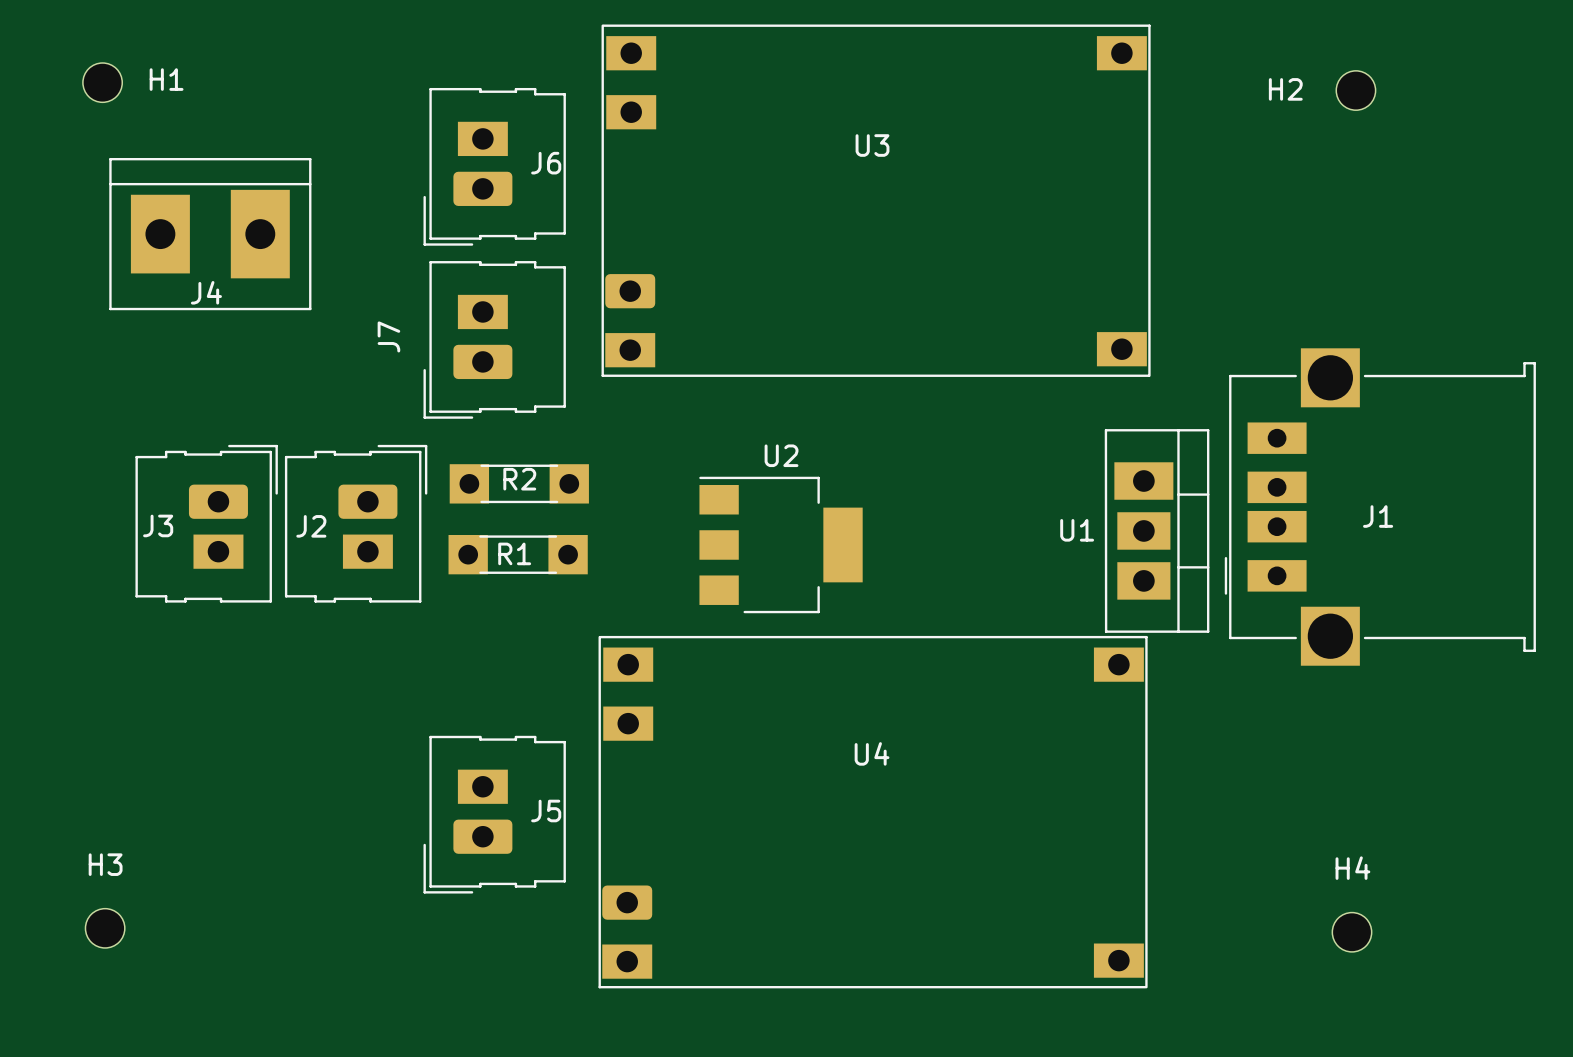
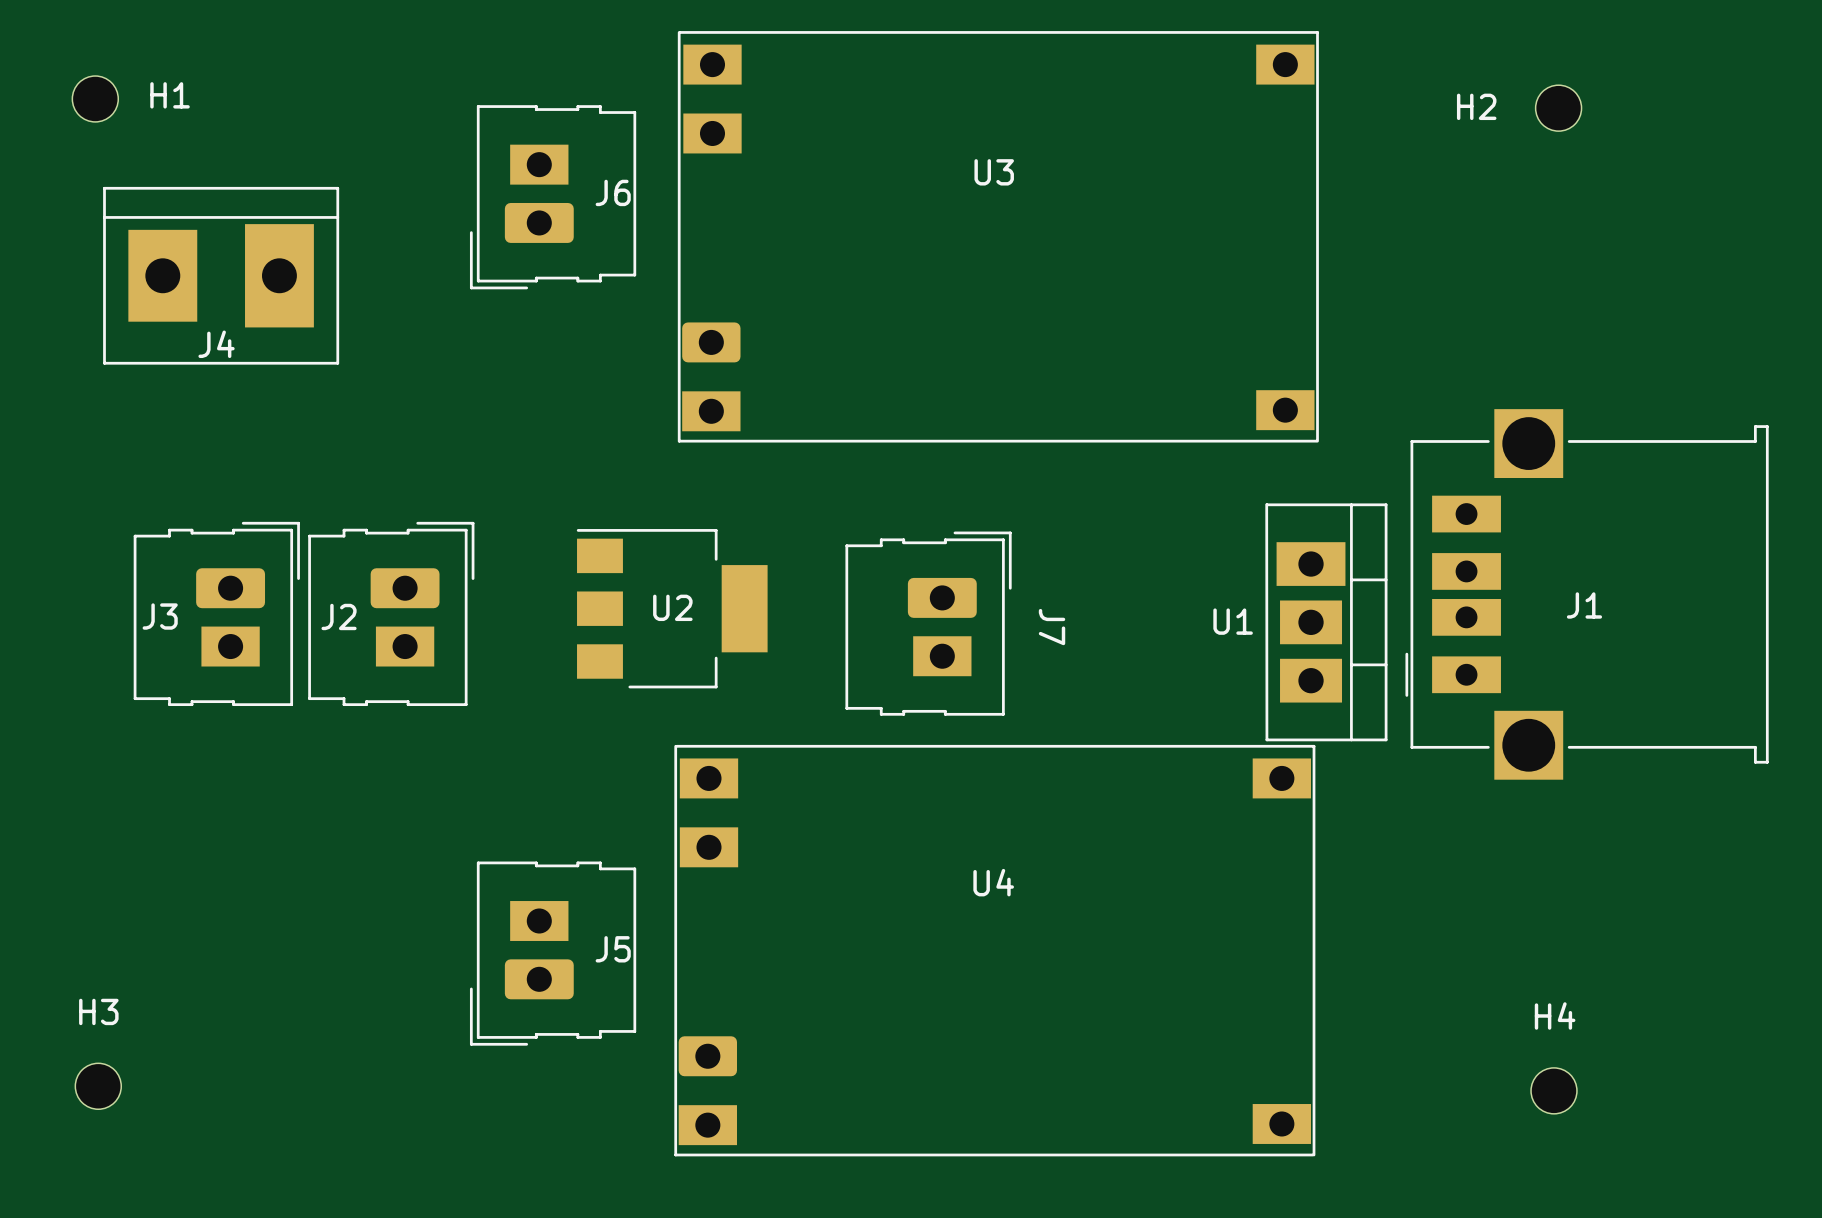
J7 rotation: 0° (494, 339) -> 180° (928, 623)
J7 position: (494, 339) -> (928, 623)
U2 name position: U2 (781, 455) -> U2 (672, 607)
R2: (519, 483) -> none
U2 position: (780, 544) -> (672, 608)
R1: (518, 554) -> none

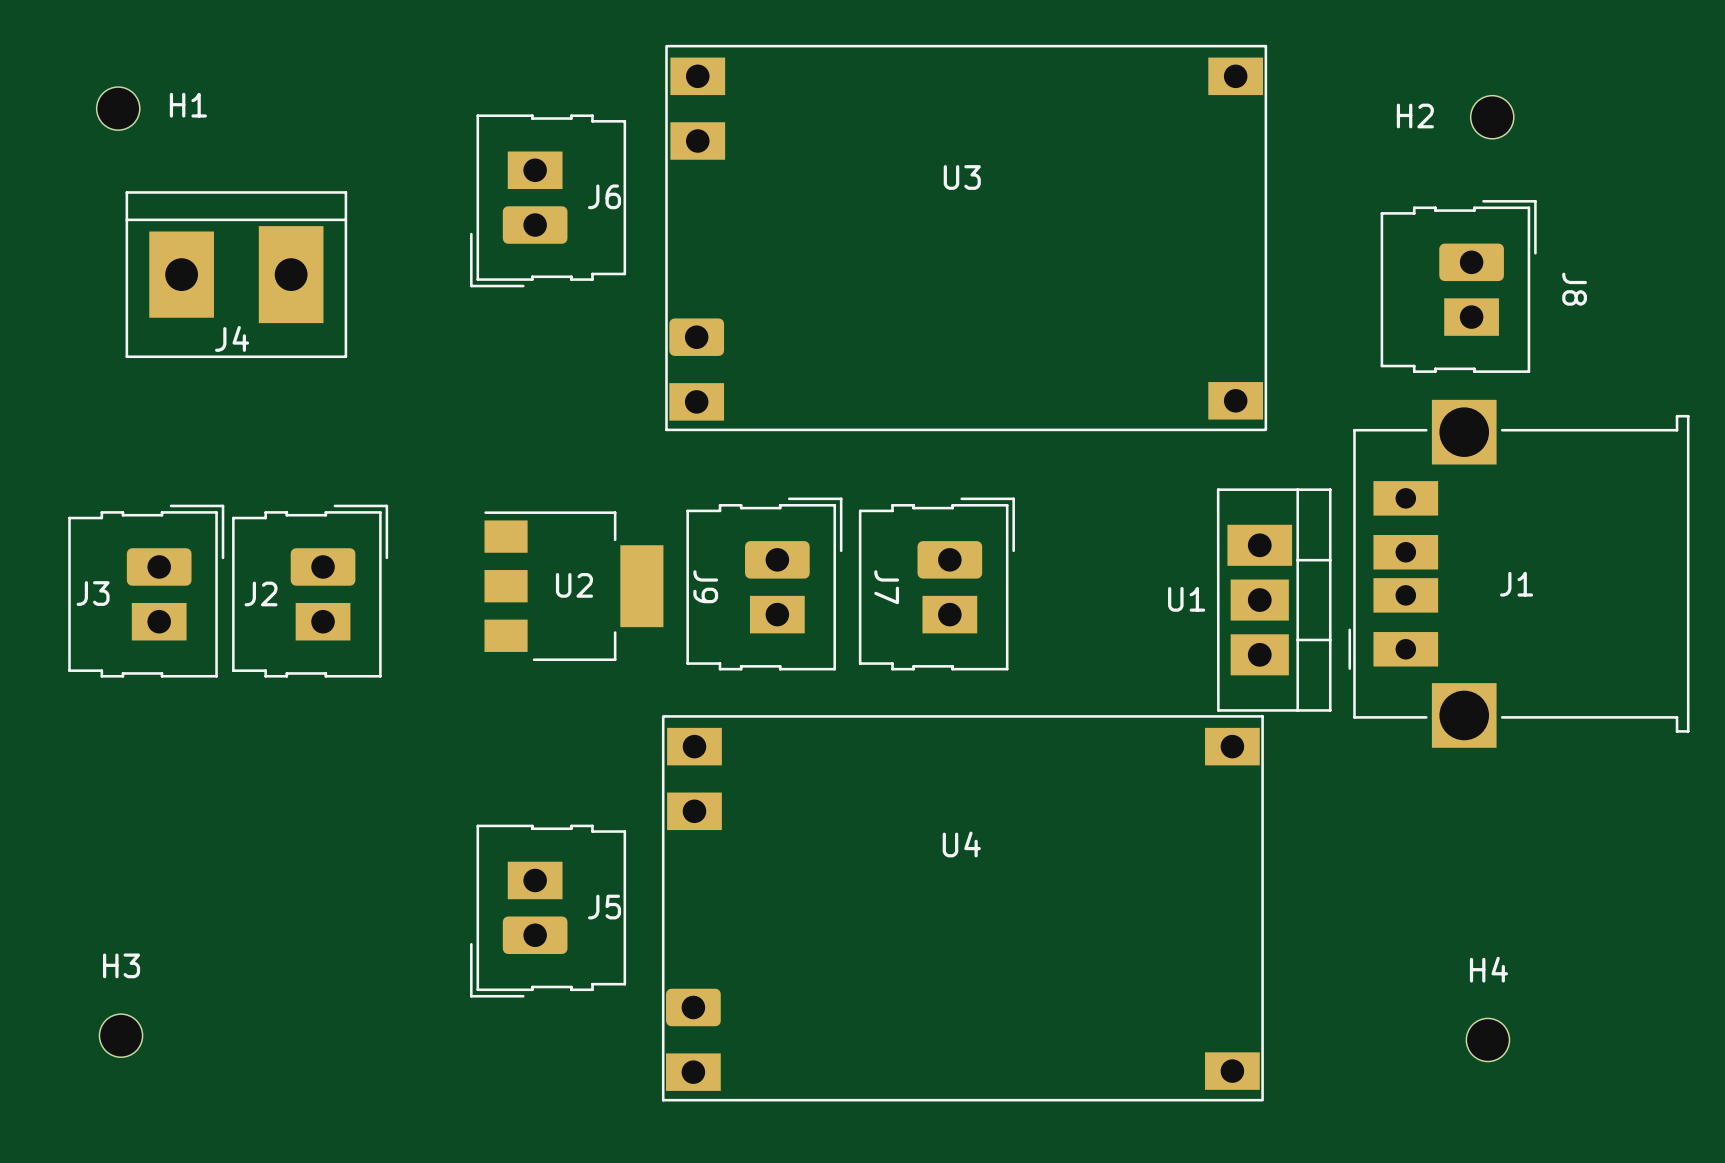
J8: none -> (1458, 286)
J9: none -> (764, 583)
U2 position: (672, 608) -> (573, 586)
J3 position: (216, 613) -> (146, 591)
J2 position: (391, 613) -> (310, 591)
J7 position: (928, 623) -> (936, 583)
J7 name position: J7 (1052, 627) -> J7 (886, 587)

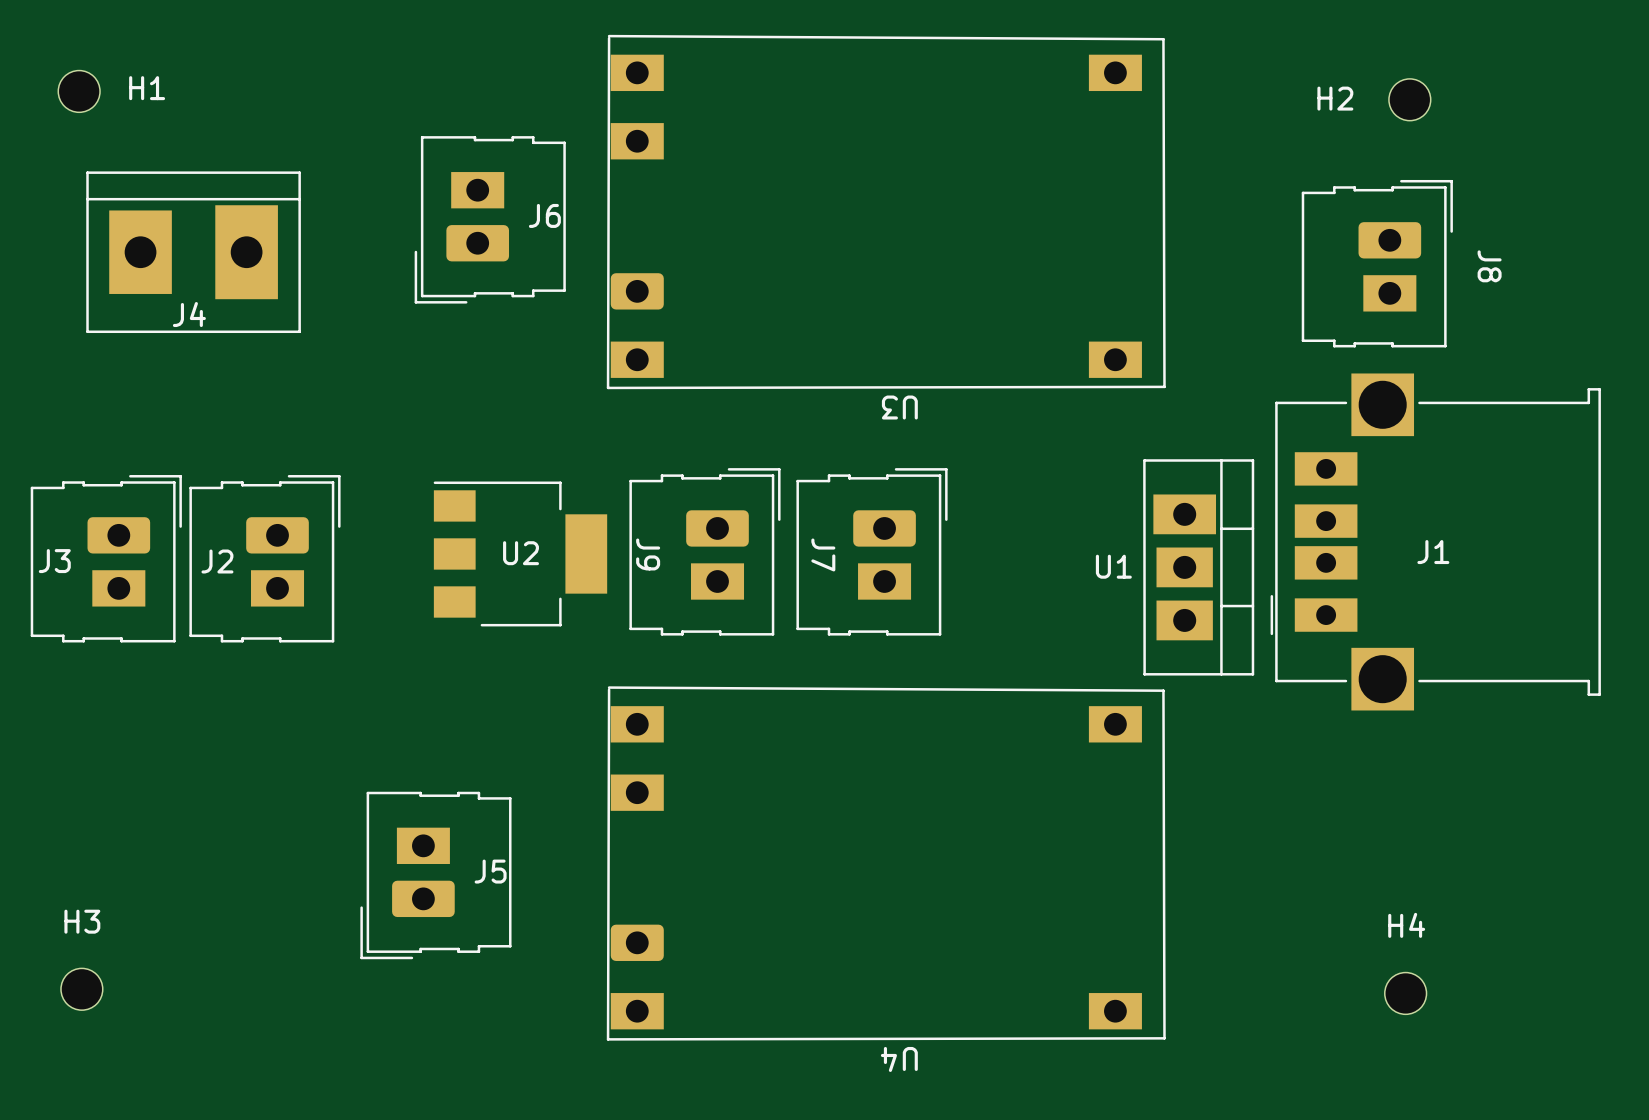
U3 footprint: [665, 44, 1268, 432] -> [606, 34, 1166, 390]
U3 name position: U3 (962, 177) -> U3 (899, 407)
J6 position: (548, 200) -> (490, 219)
U4 footprint: [661, 715, 1264, 1102] -> [606, 686, 1166, 1041]
U4 name position: U4 (961, 844) -> U4 (899, 1059)
J5 position: (548, 911) -> (435, 875)

